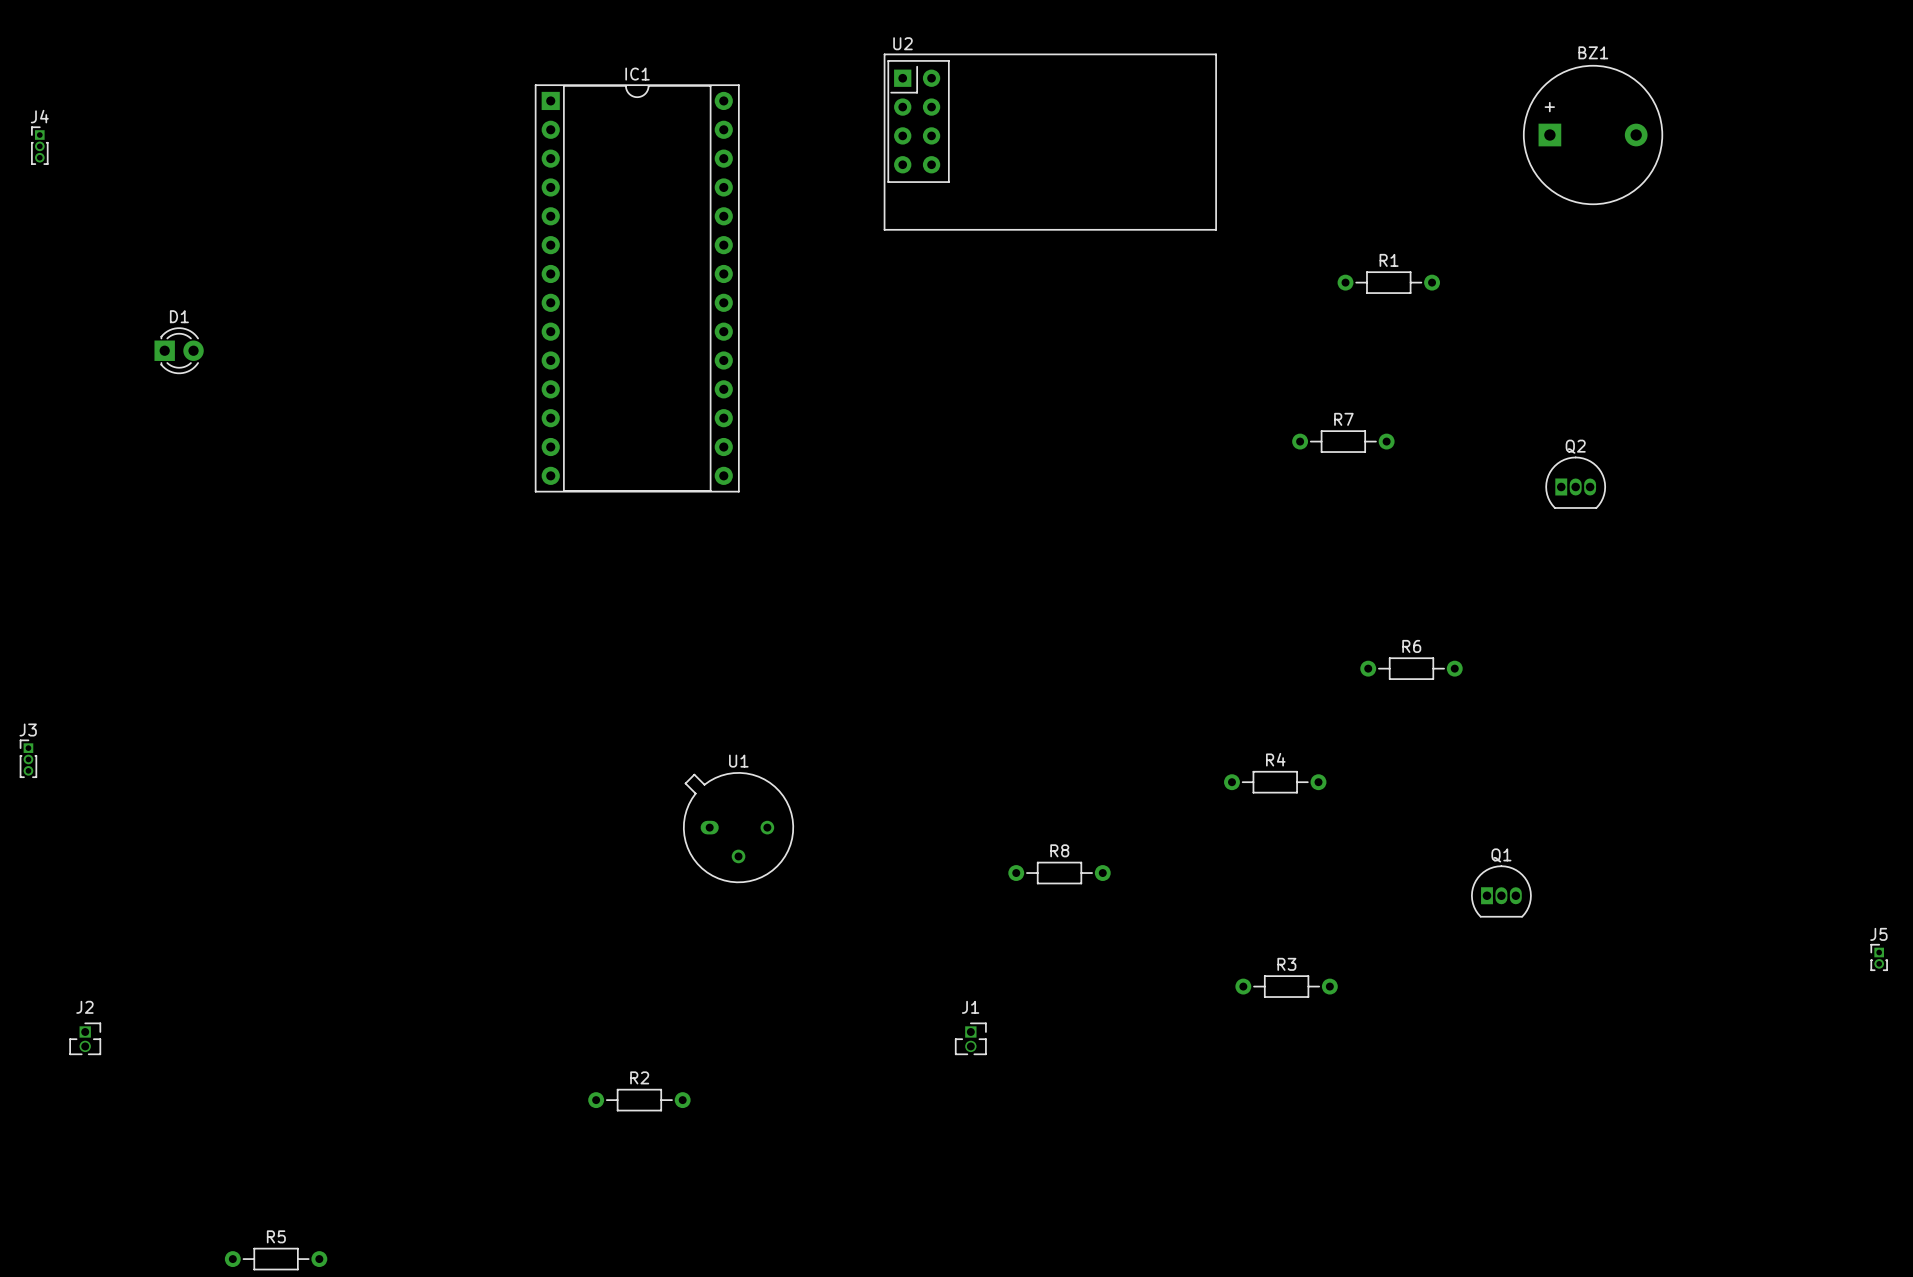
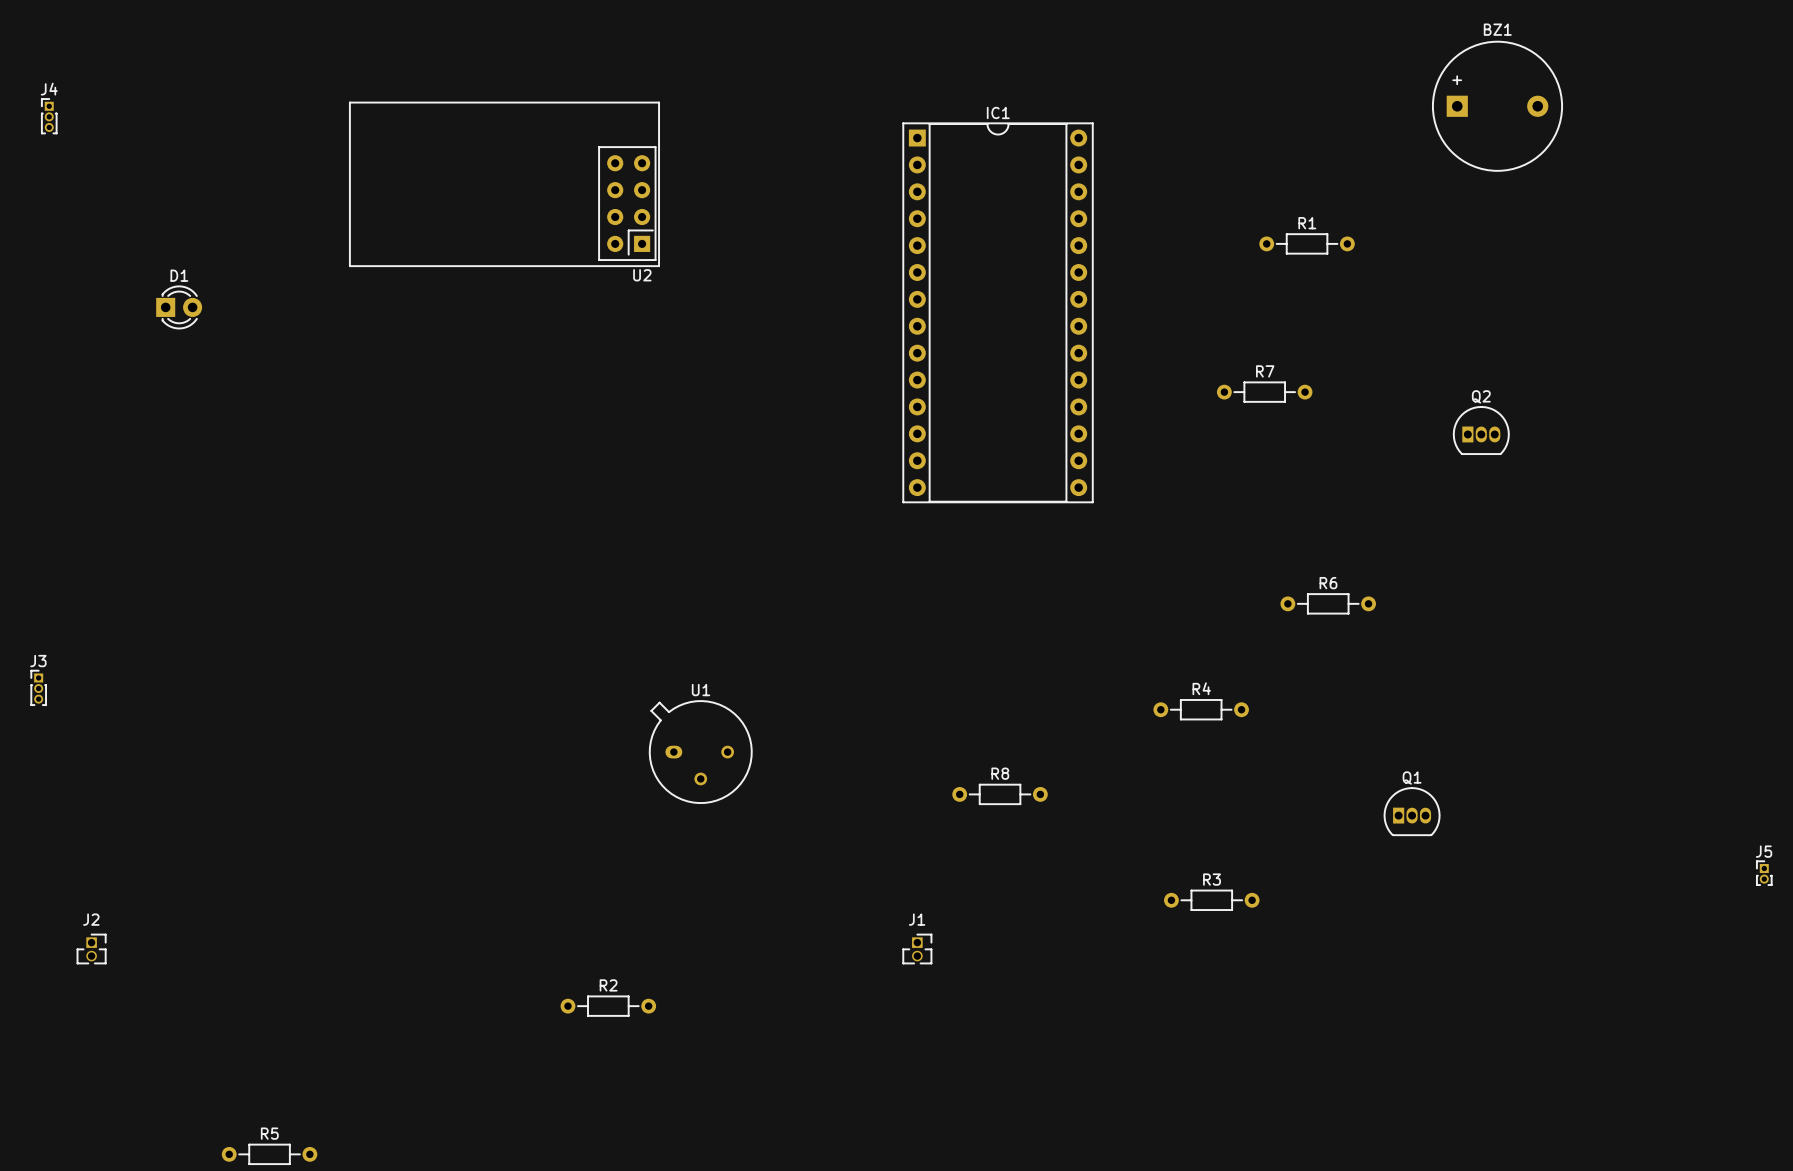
U2 rotation: 0° (1050, 142) -> 180° (504, 184)
U2 position: (1050, 142) -> (504, 184)
IC1 position: (637, 288) -> (998, 312)

